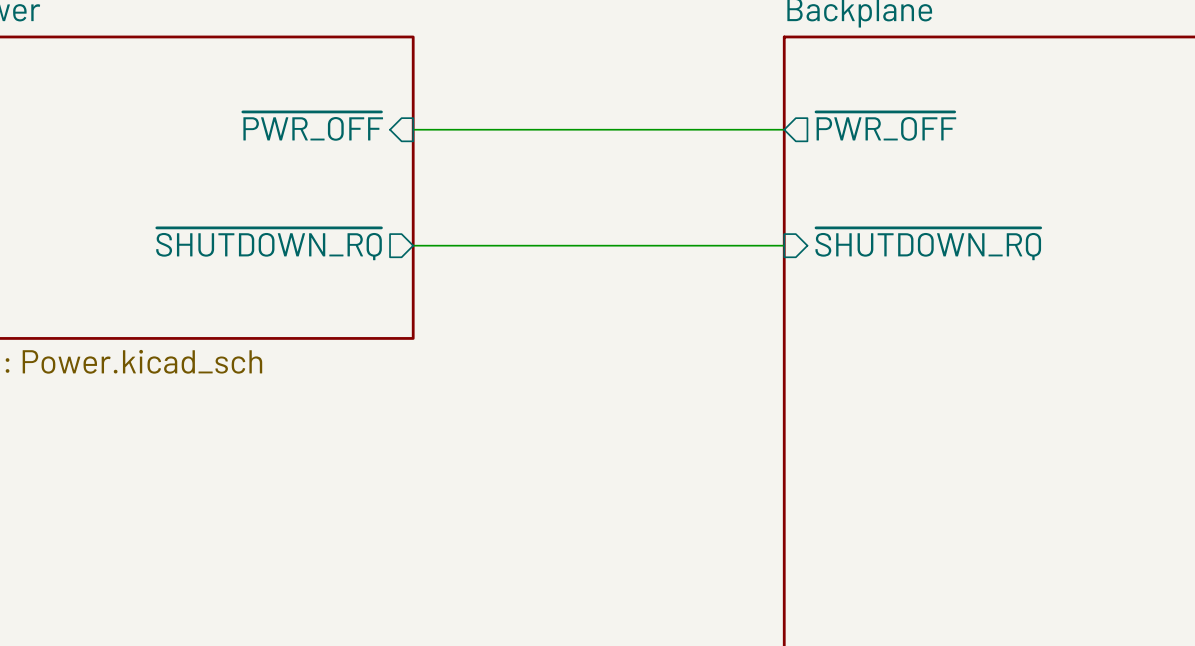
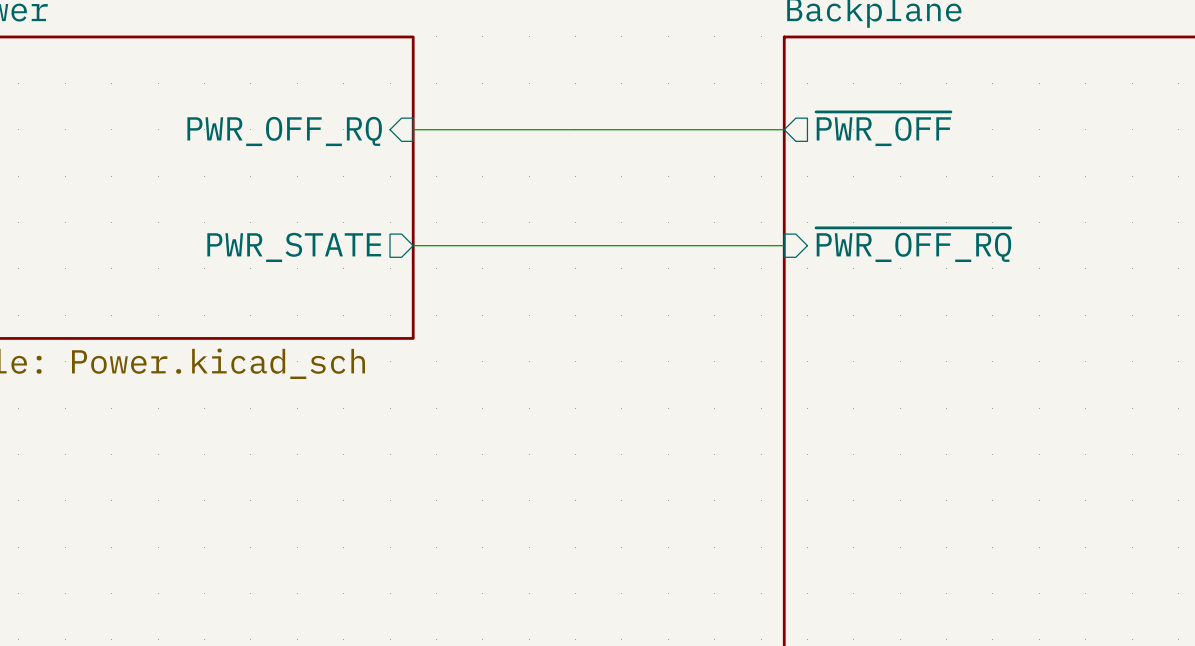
sheet pin: ~{PWR_OFF} (312, 126) -> PWR_OFF_RQ (284, 131)
sheet pin: ~{SHUTDOWN_RQ} (269, 244) -> PWR_STATE (294, 247)
sheet pin: ~{SHUTDOWN_RQ} (928, 244) -> ~{PWR_OFF_RQ} (913, 244)

